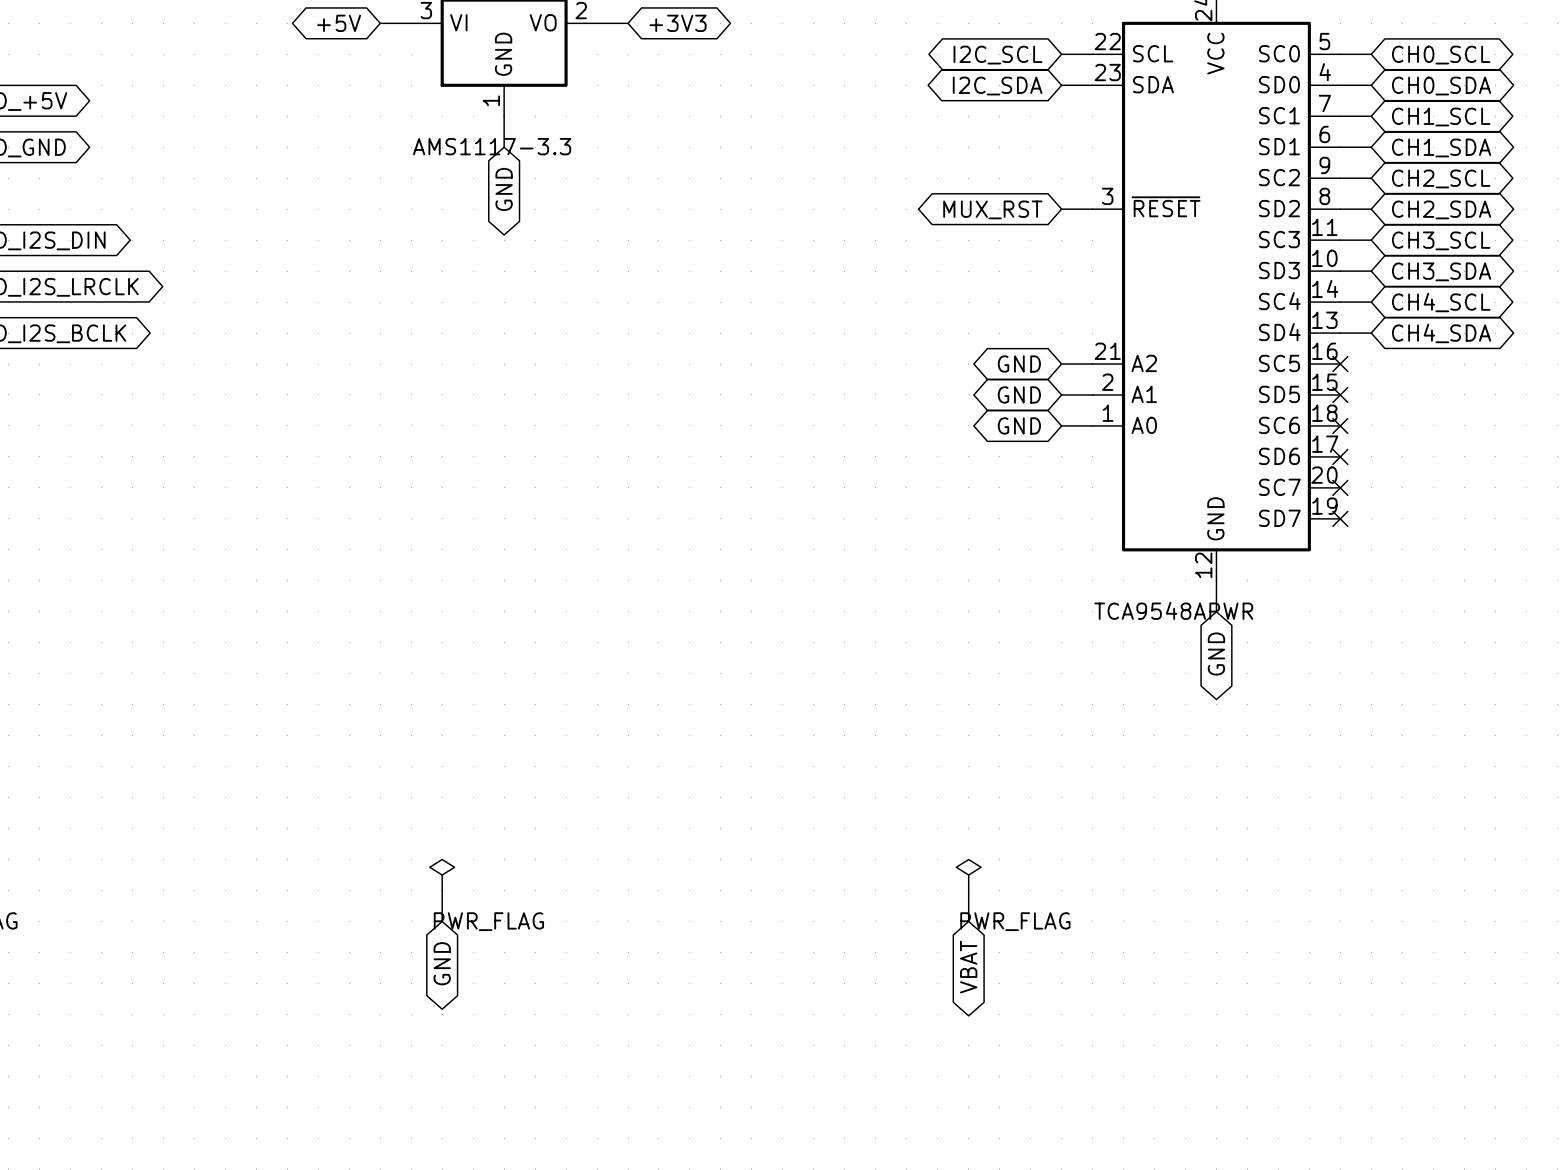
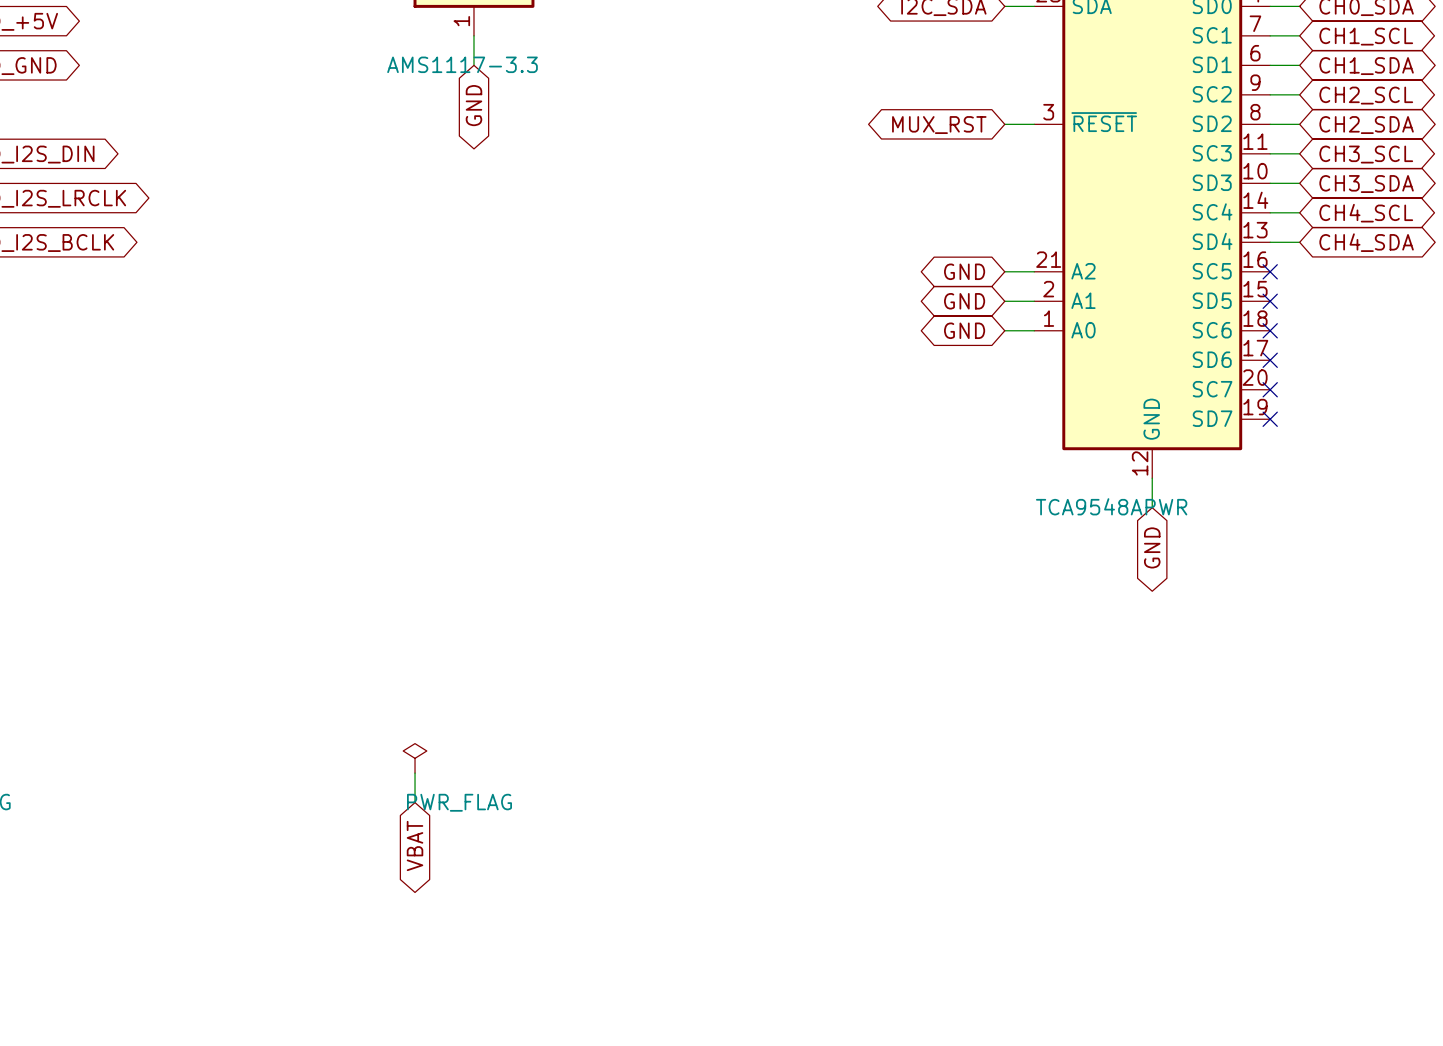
power symbol: PWR_FLAG (968, 875) -> none
wire: (968, 890) (968, 921) -> none
global label: GND (442, 963) -> VBAT (415, 845)
global label: VBAT (968, 967) -> none

